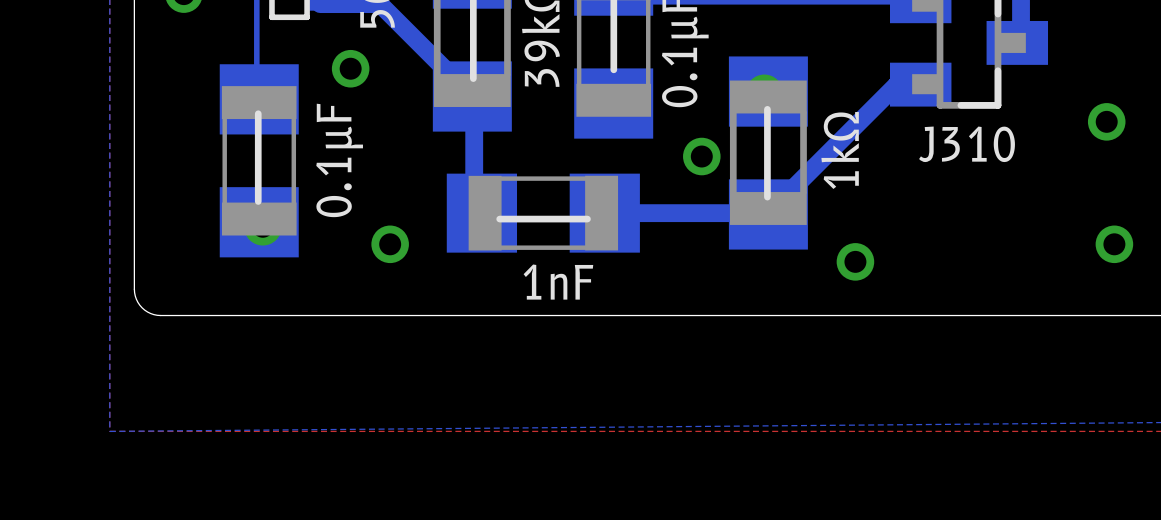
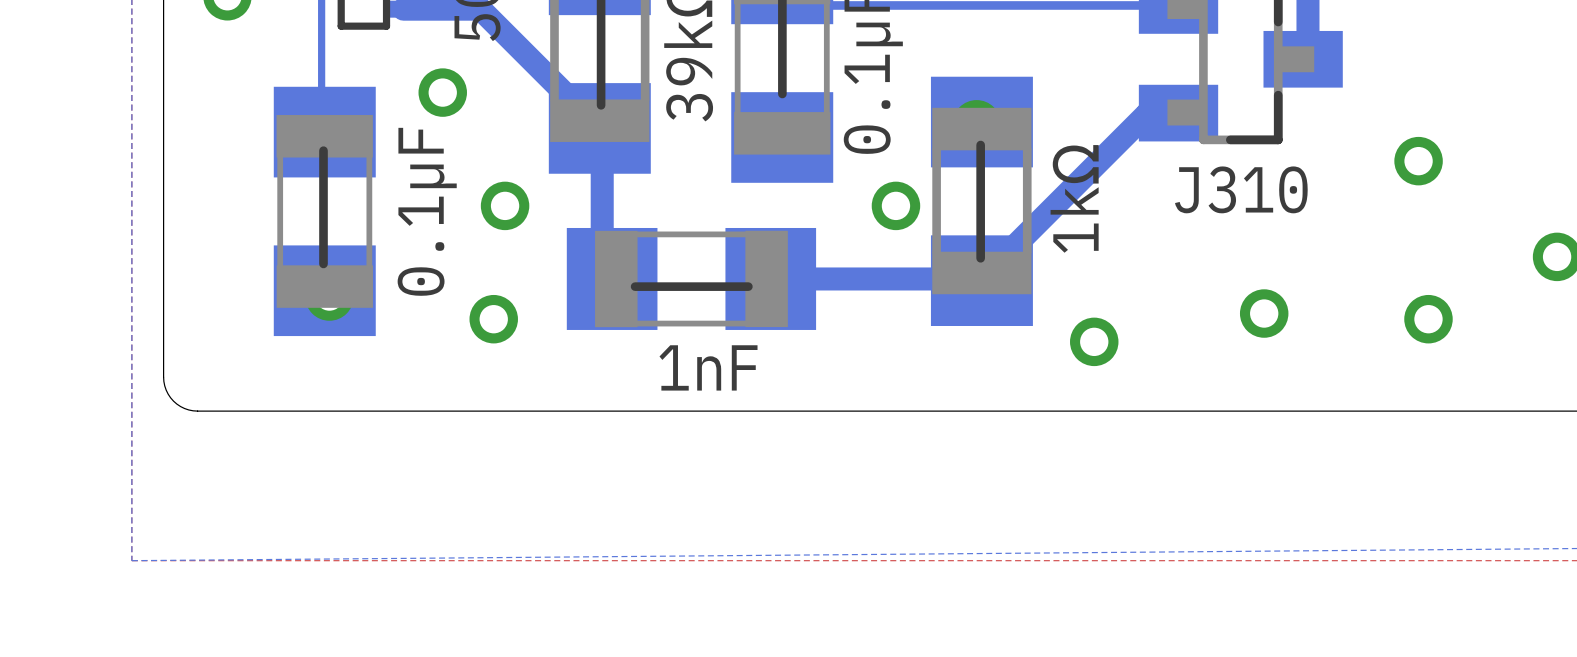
via: none -> (505, 205)
via: none -> (1264, 313)

